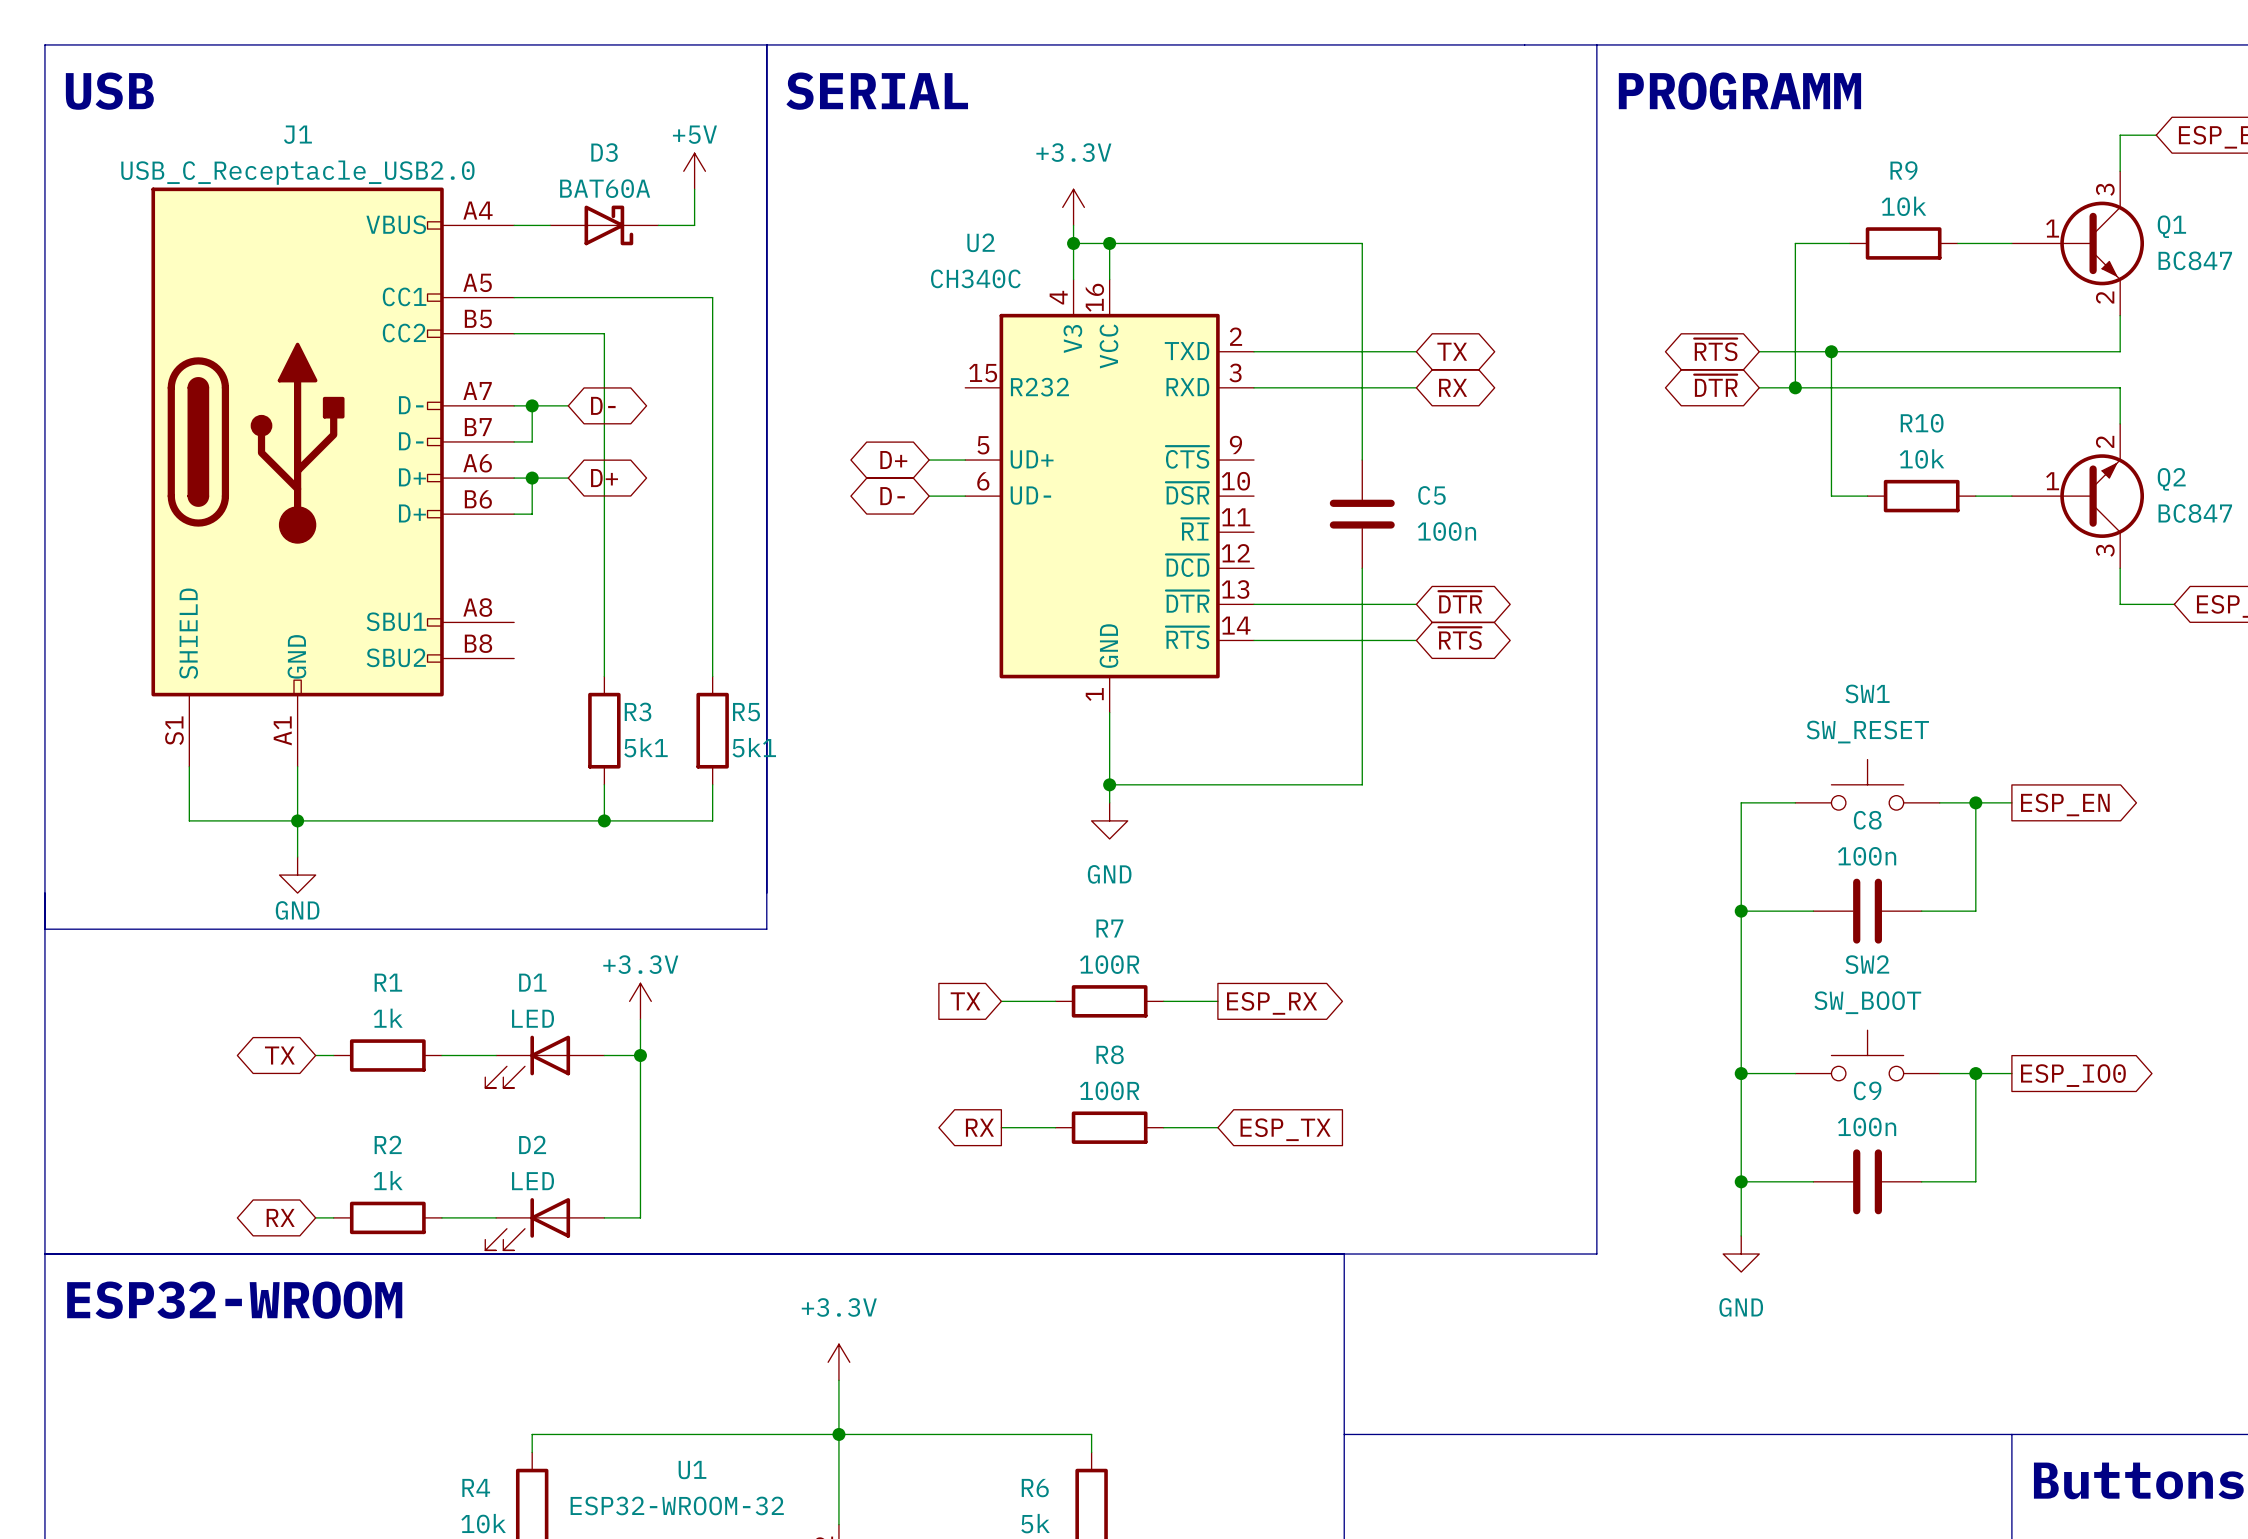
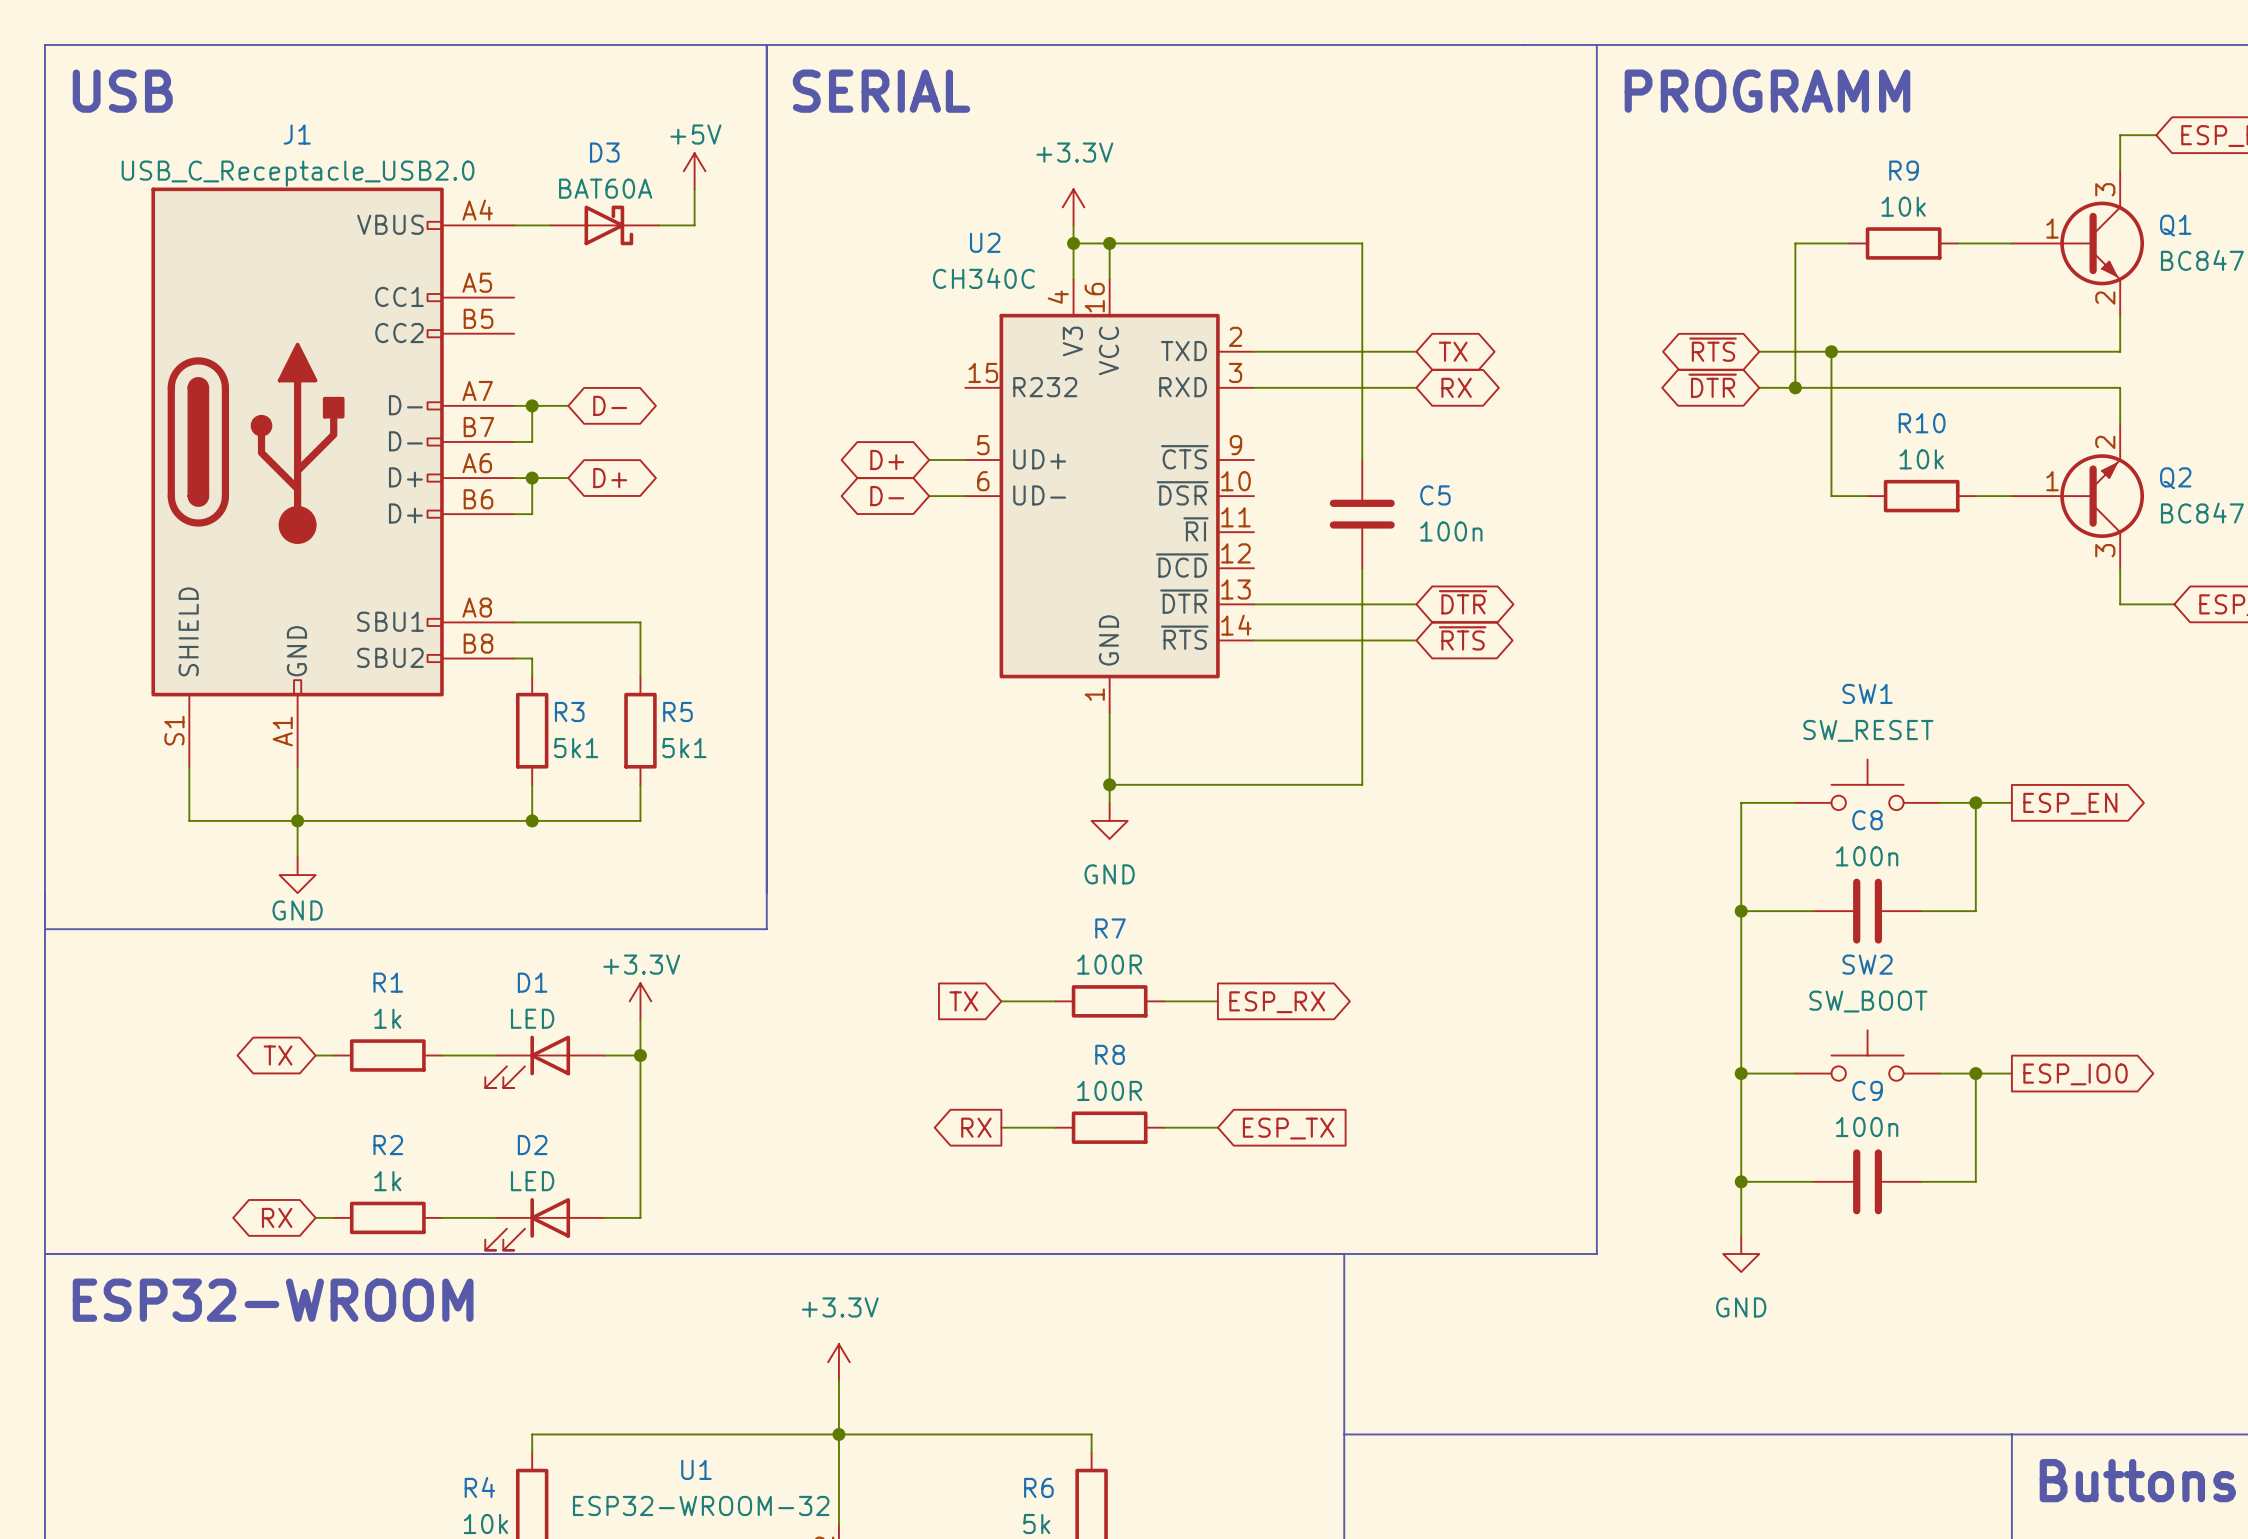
wire: (514, 297) (712, 297) (712, 676) -> none
wire: (514, 333) (604, 333) (604, 676) -> none
wire: none -> (514, 622) (640, 622) (640, 676)
wire: none -> (514, 658) (532, 658) (532, 676)
R3 position: (604, 730) -> (532, 730)
R5 position: (712, 730) -> (640, 730)
wire: (604, 784) (604, 820) -> (532, 784) (532, 820)
wire: (712, 784) (712, 820) (640, 820) -> (640, 784) (640, 820)
junction position: (604, 820) -> (532, 820)

